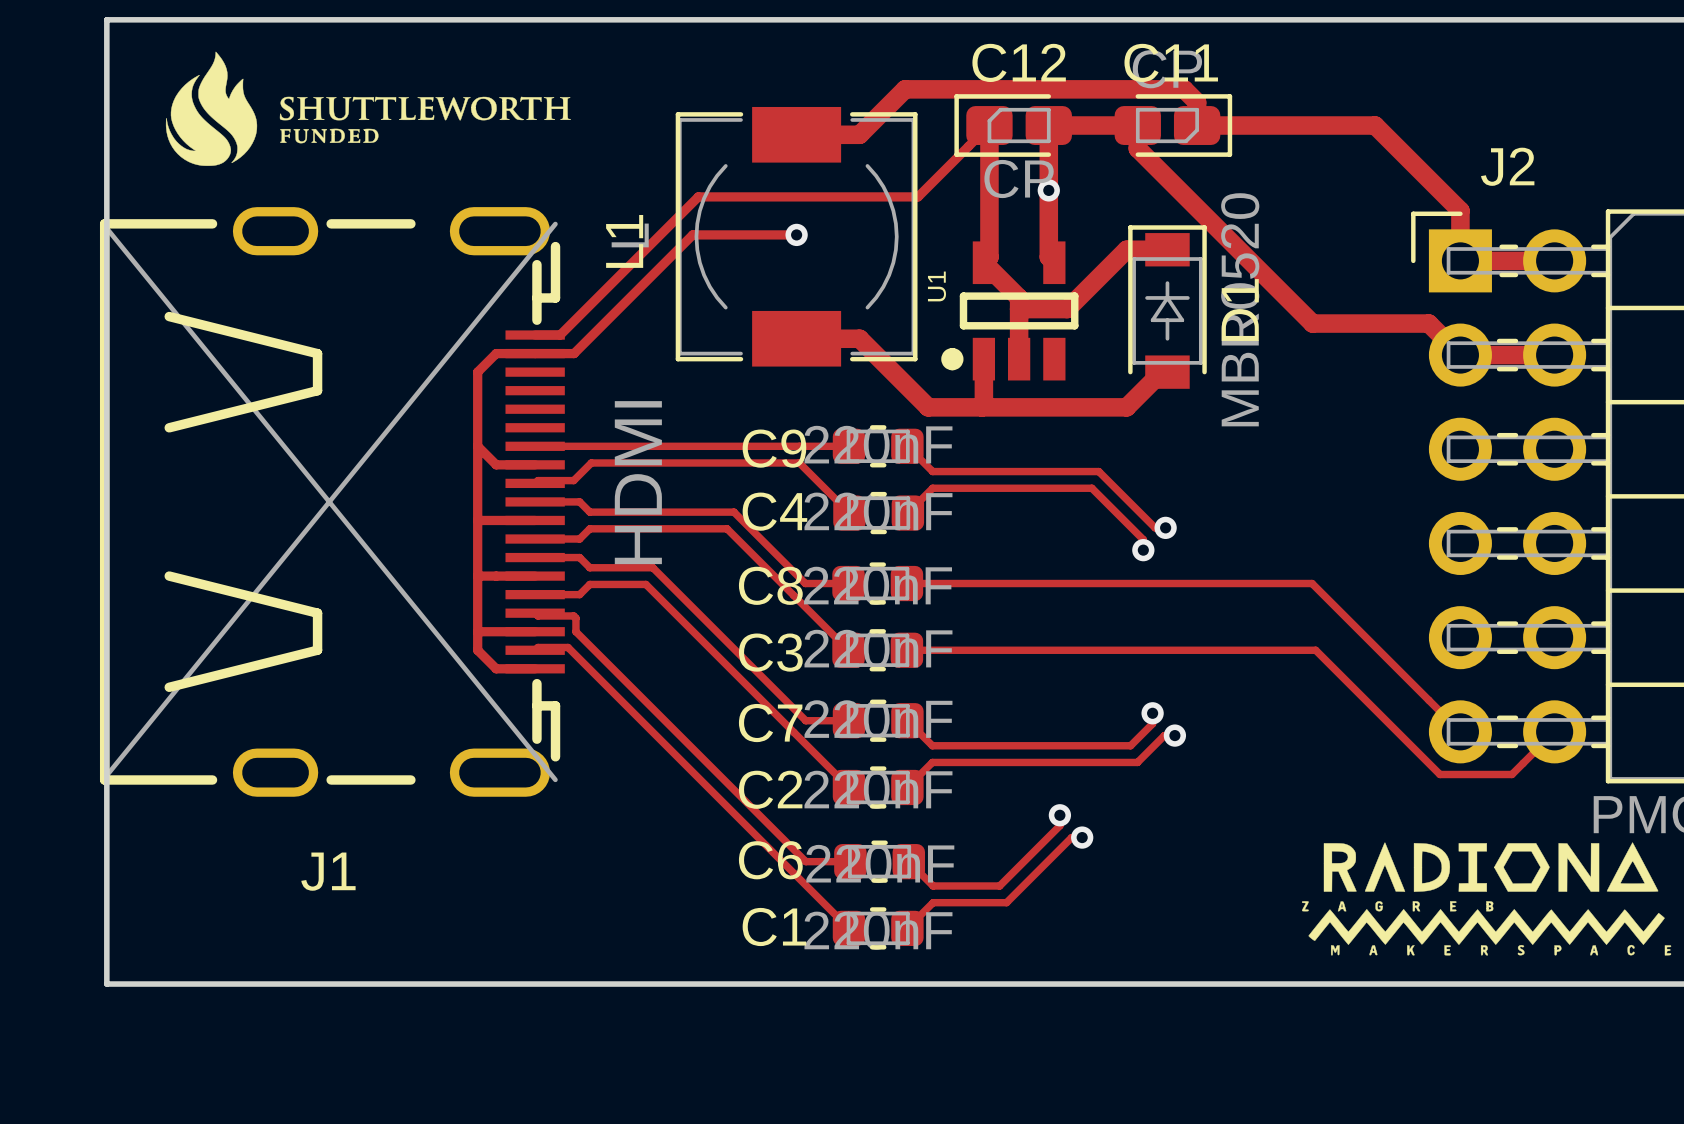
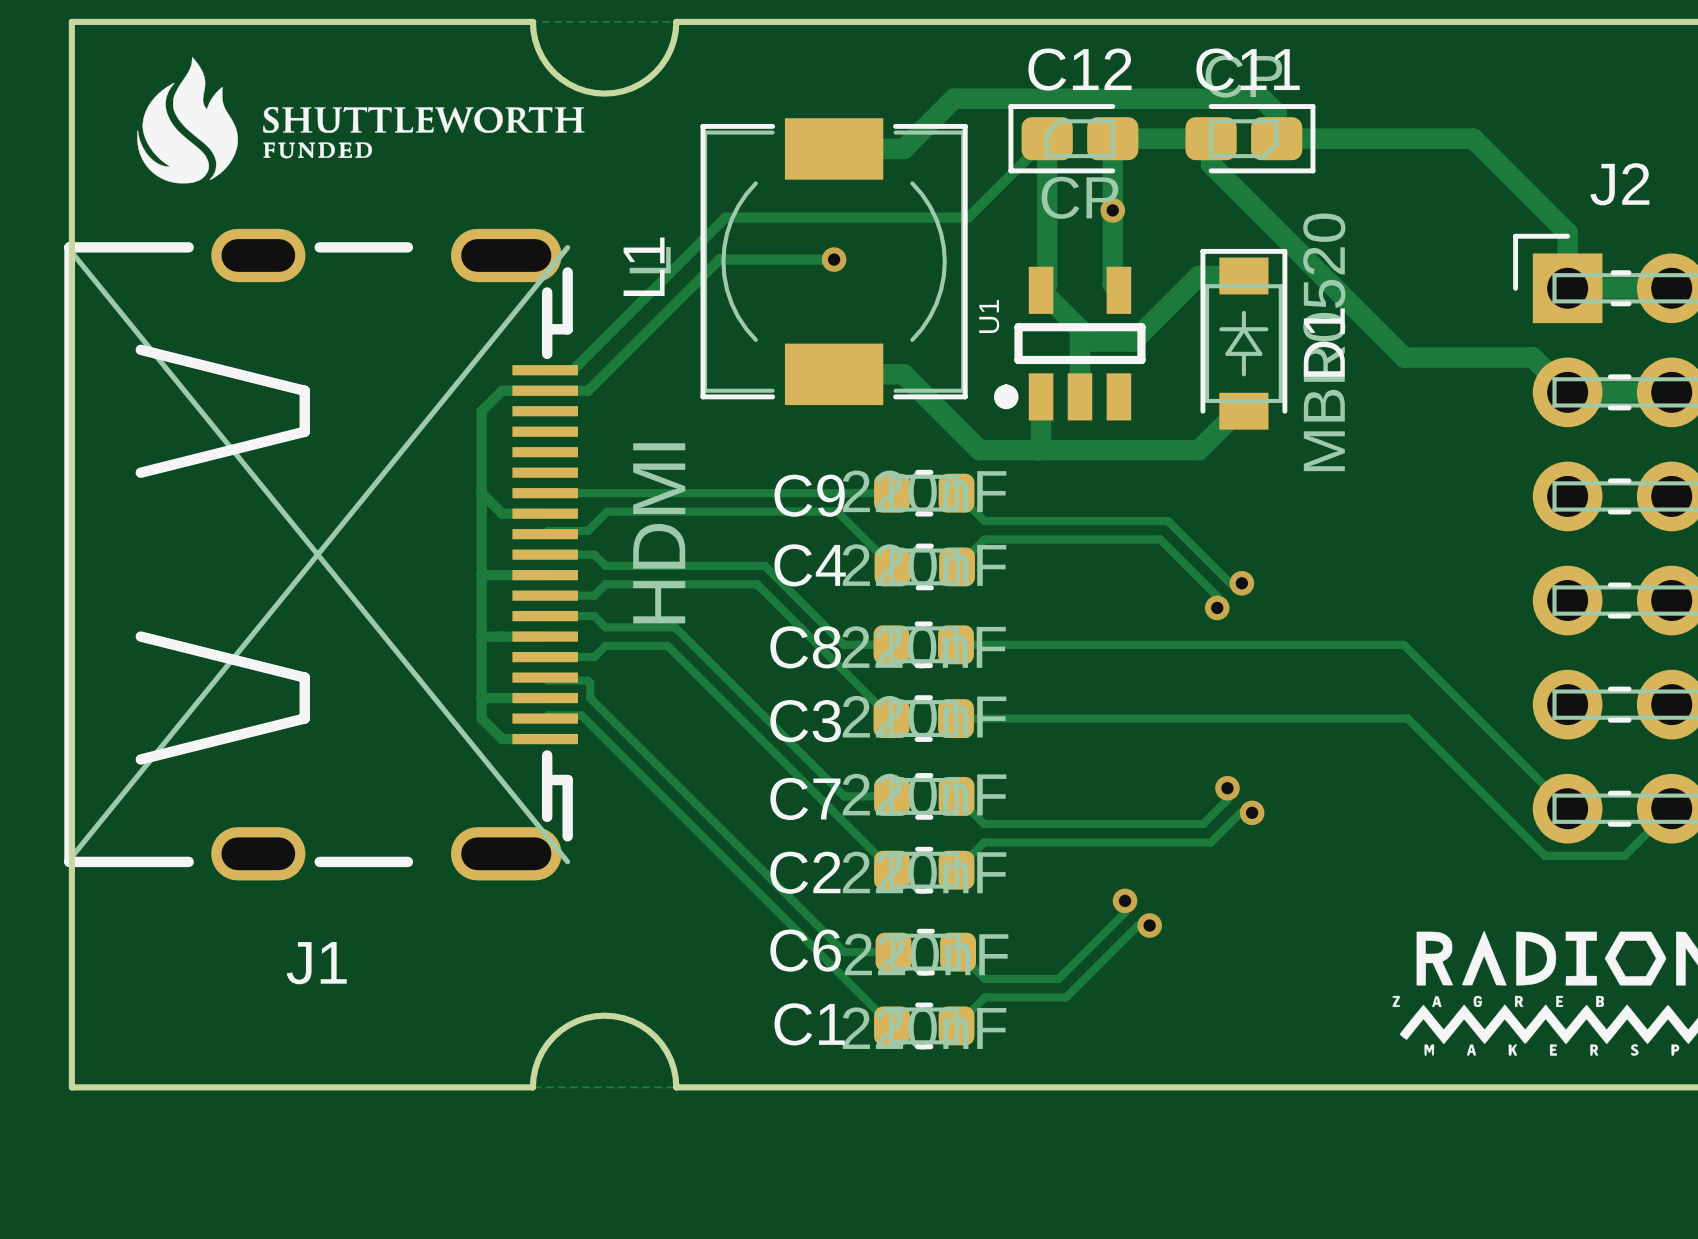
board edge: (524, 19) (653, 19) -> (532, 21) (538, 49) (553, 72) (577, 88) (604, 93) (632, 88) (655, 72) (670, 49) (676, 21)
board edge: (524, 984) (653, 984) -> (532, 1087) (538, 1059) (553, 1036) (577, 1021) (604, 1015) (632, 1021) (655, 1036) (670, 1059) (676, 1087)

